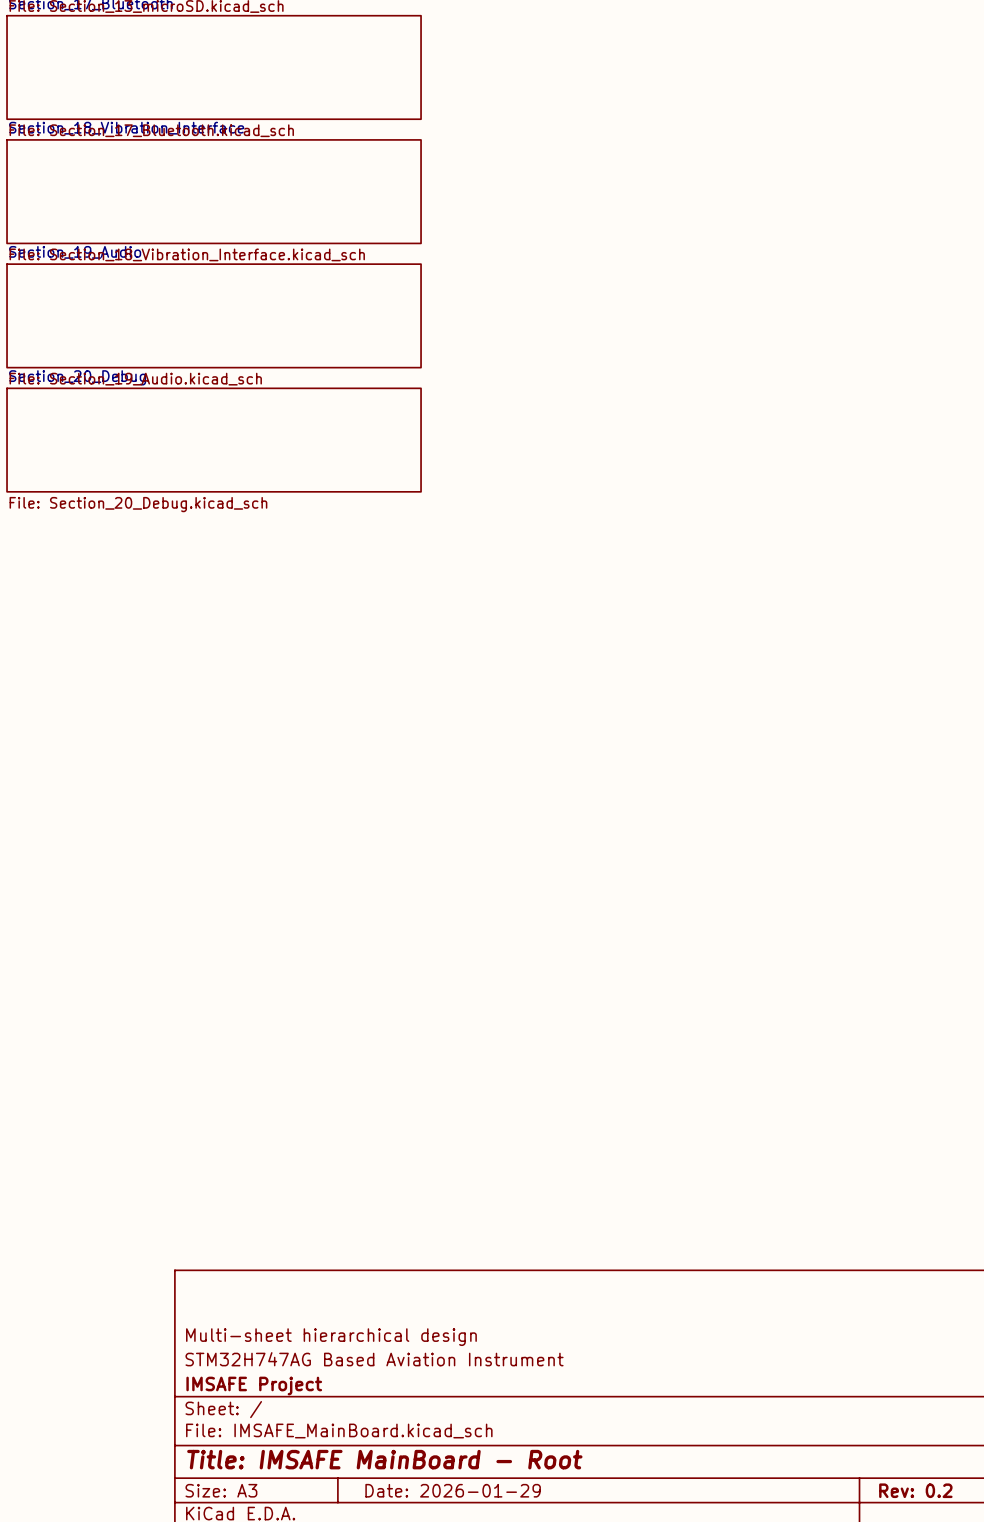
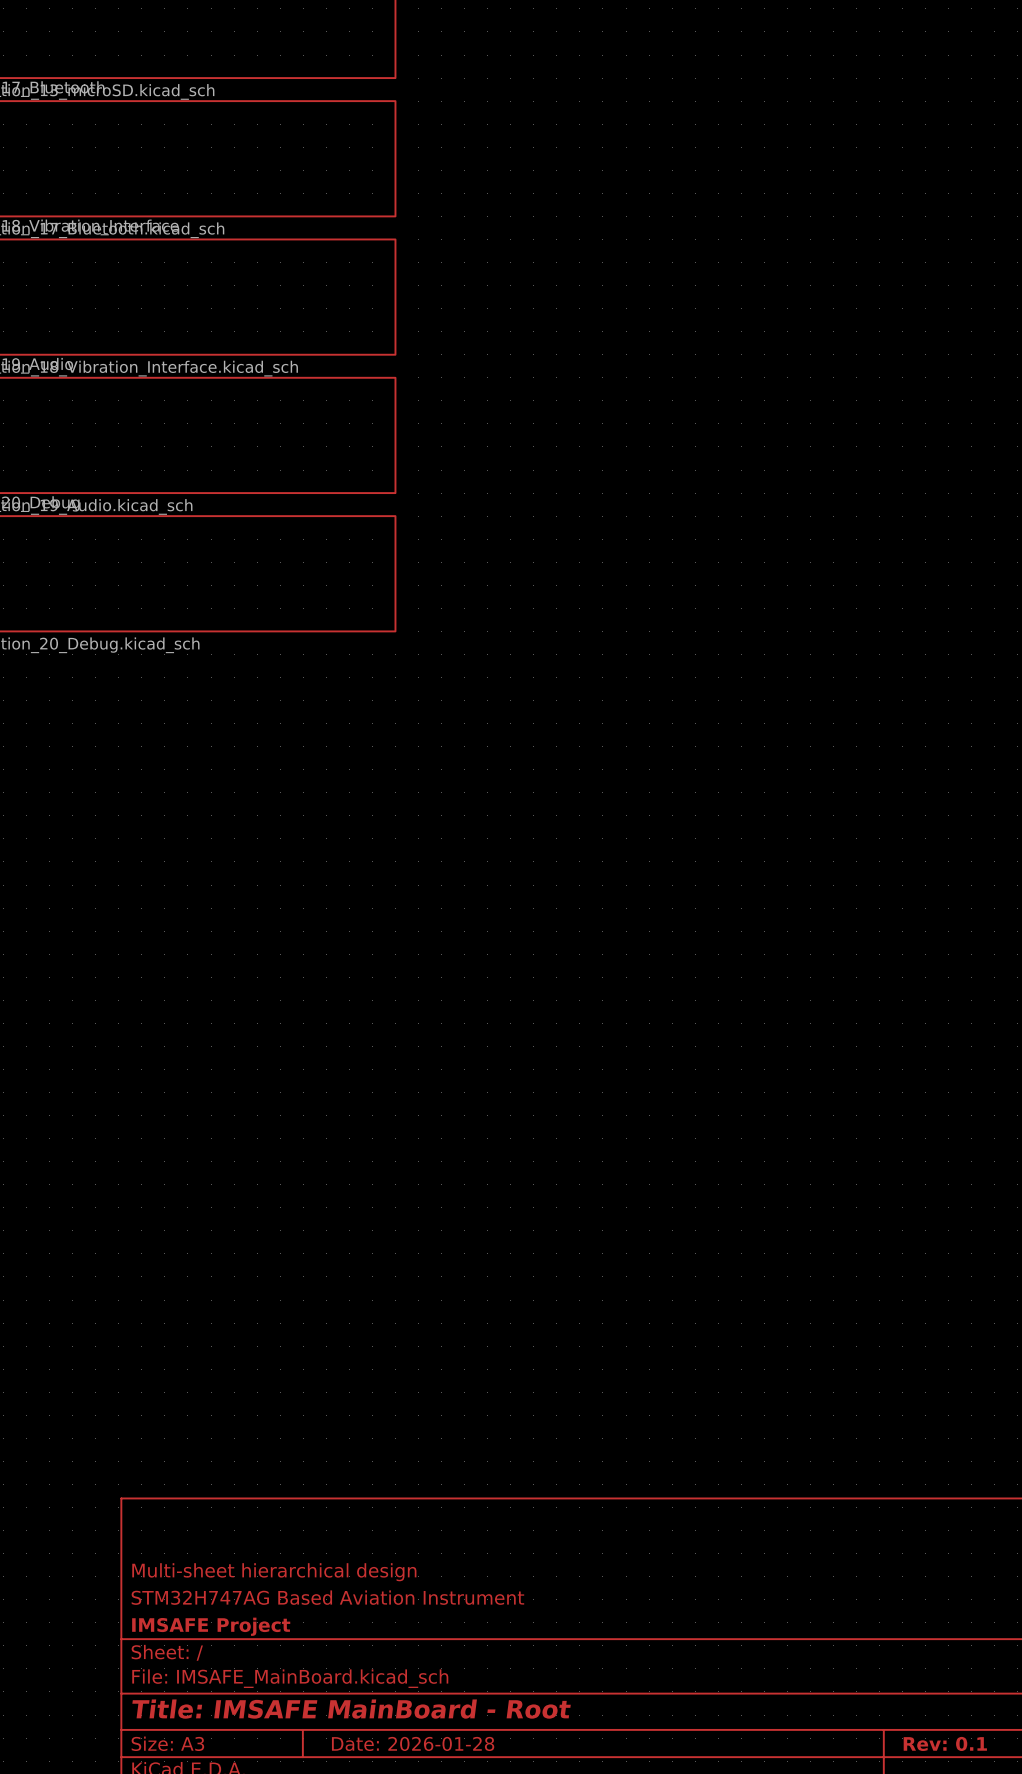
title block: Date: 2026-01-29 (453, 1490) -> Date: 2026-01-28 (413, 1743)
title block: Rev: 0.2 (915, 1490) -> Rev: 0.1 (945, 1743)

